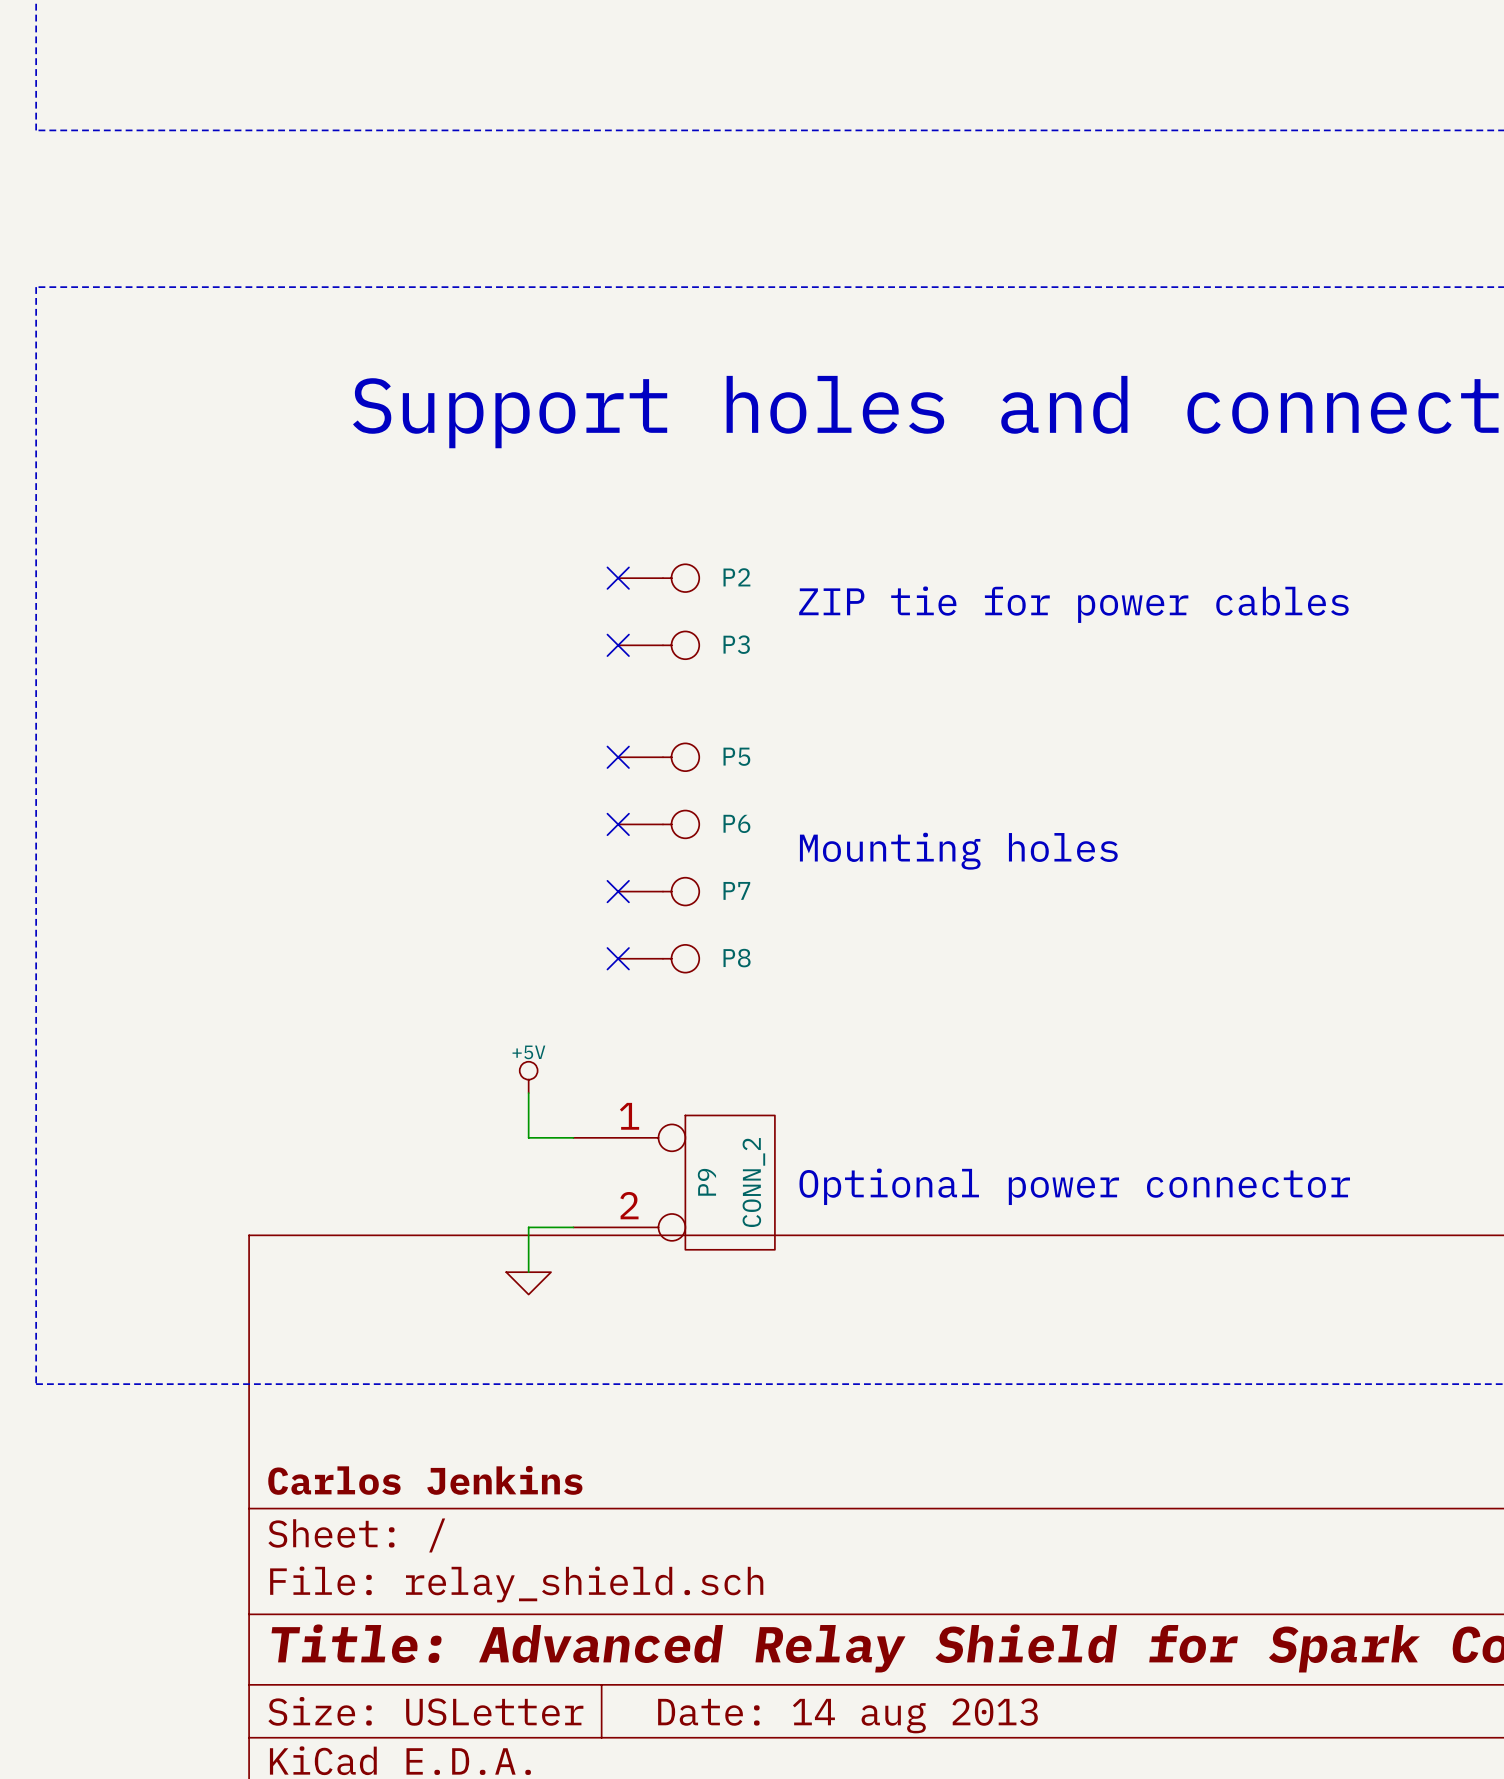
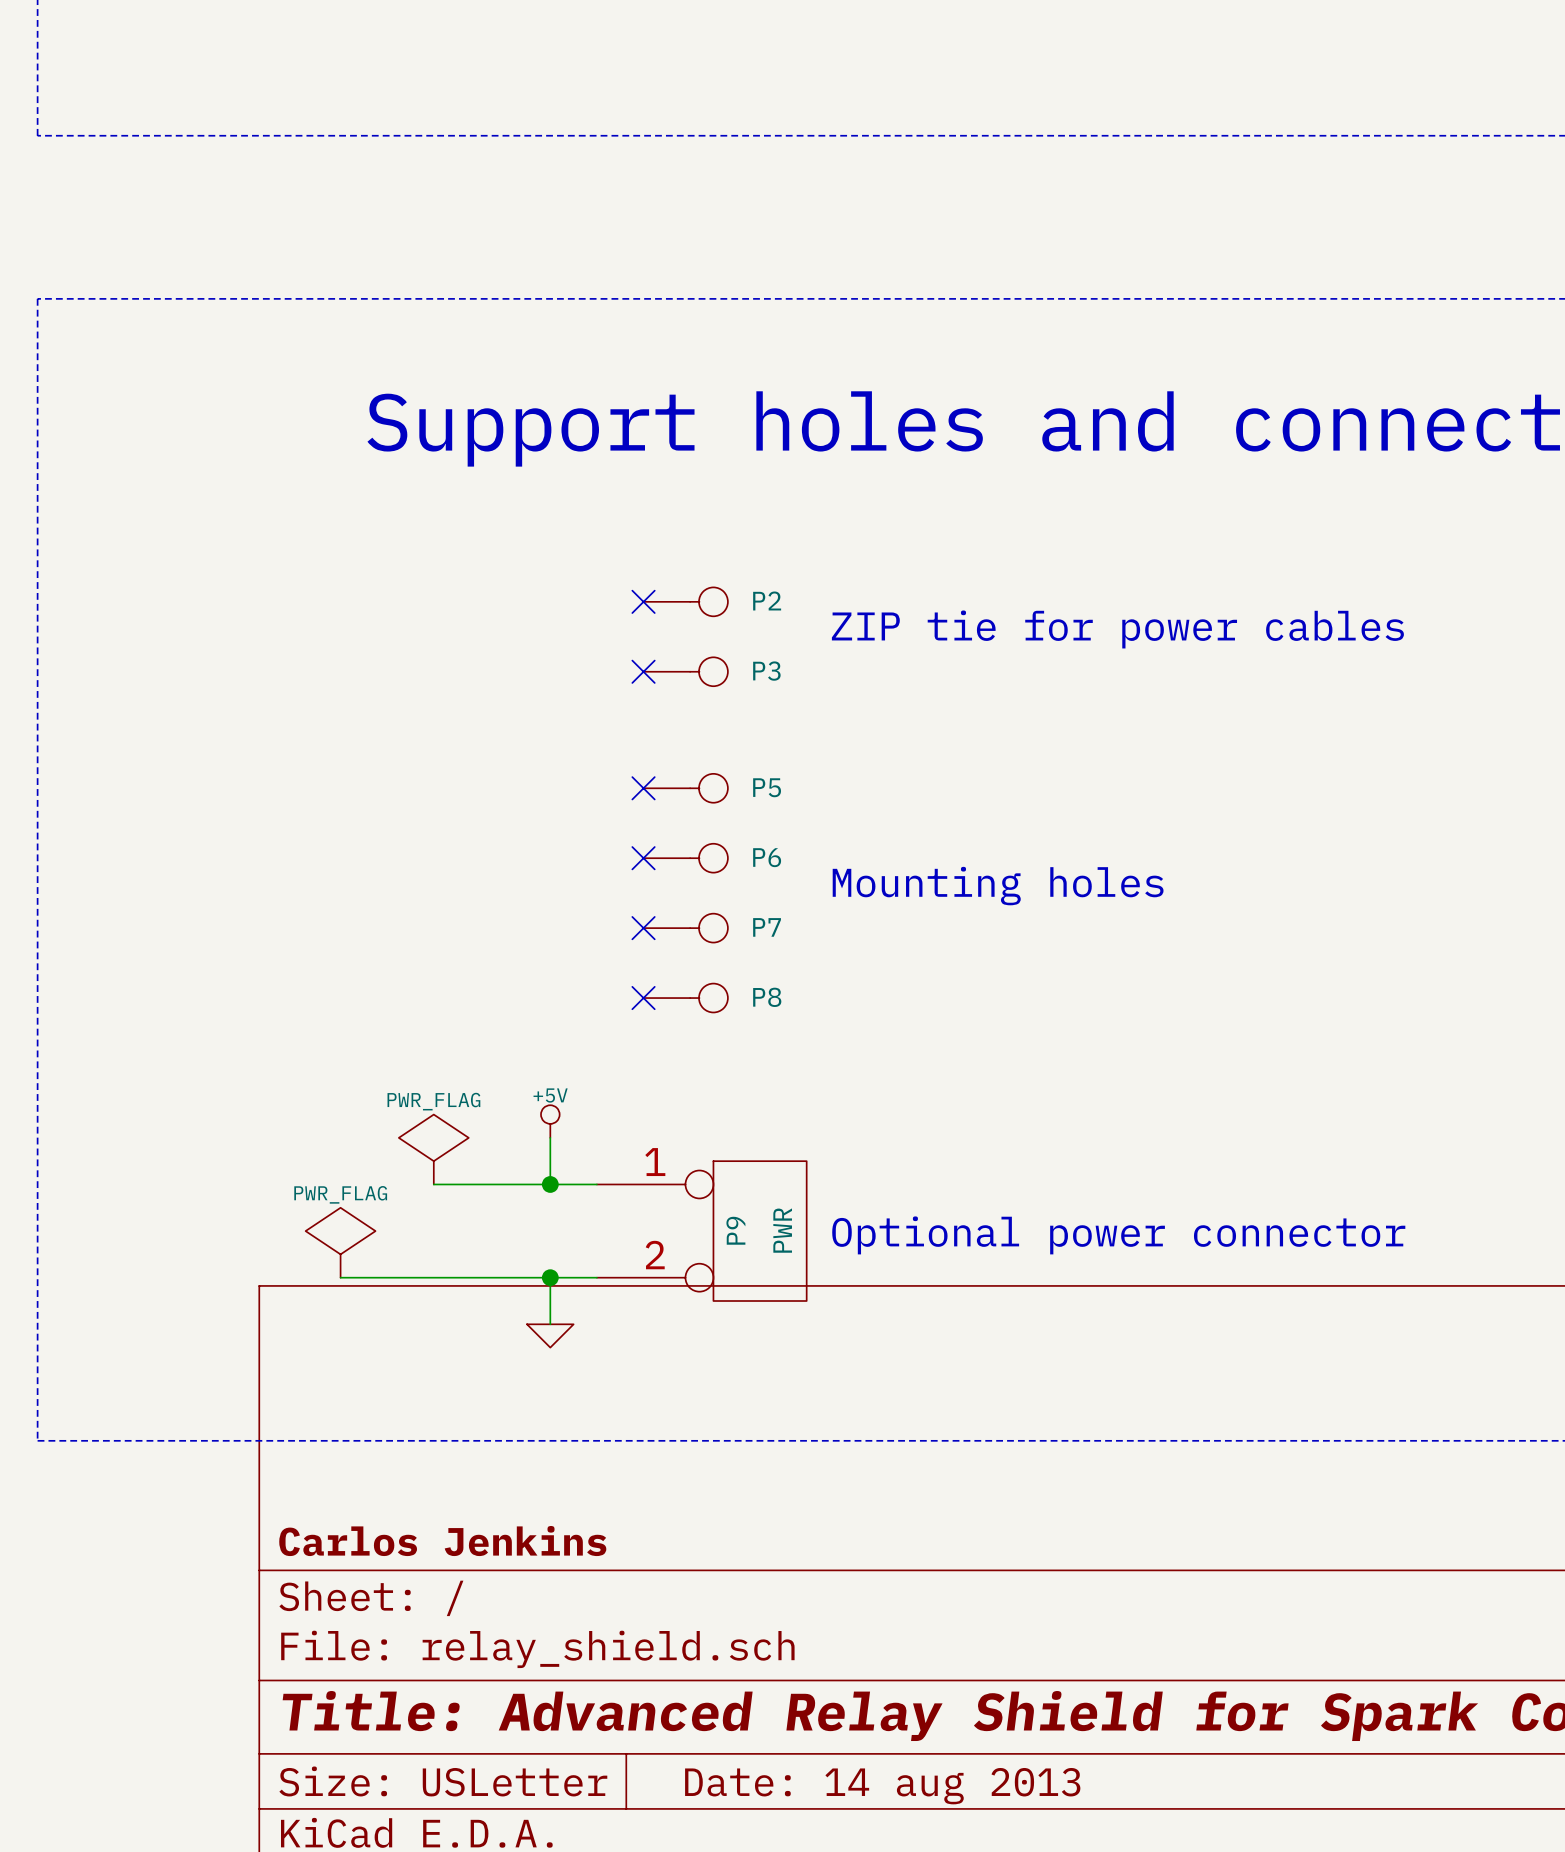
power symbol: none -> PWR_FLAG (433, 1149)
wire: none -> (433, 1184) (550, 1184)
junction: none -> (550, 1184)
P9 value: CONN_2 (753, 1182) -> PWR (782, 1230)
power symbol: none -> PWR_FLAG (340, 1242)
wire: none -> (340, 1277) (550, 1277)
junction: none -> (550, 1277)

